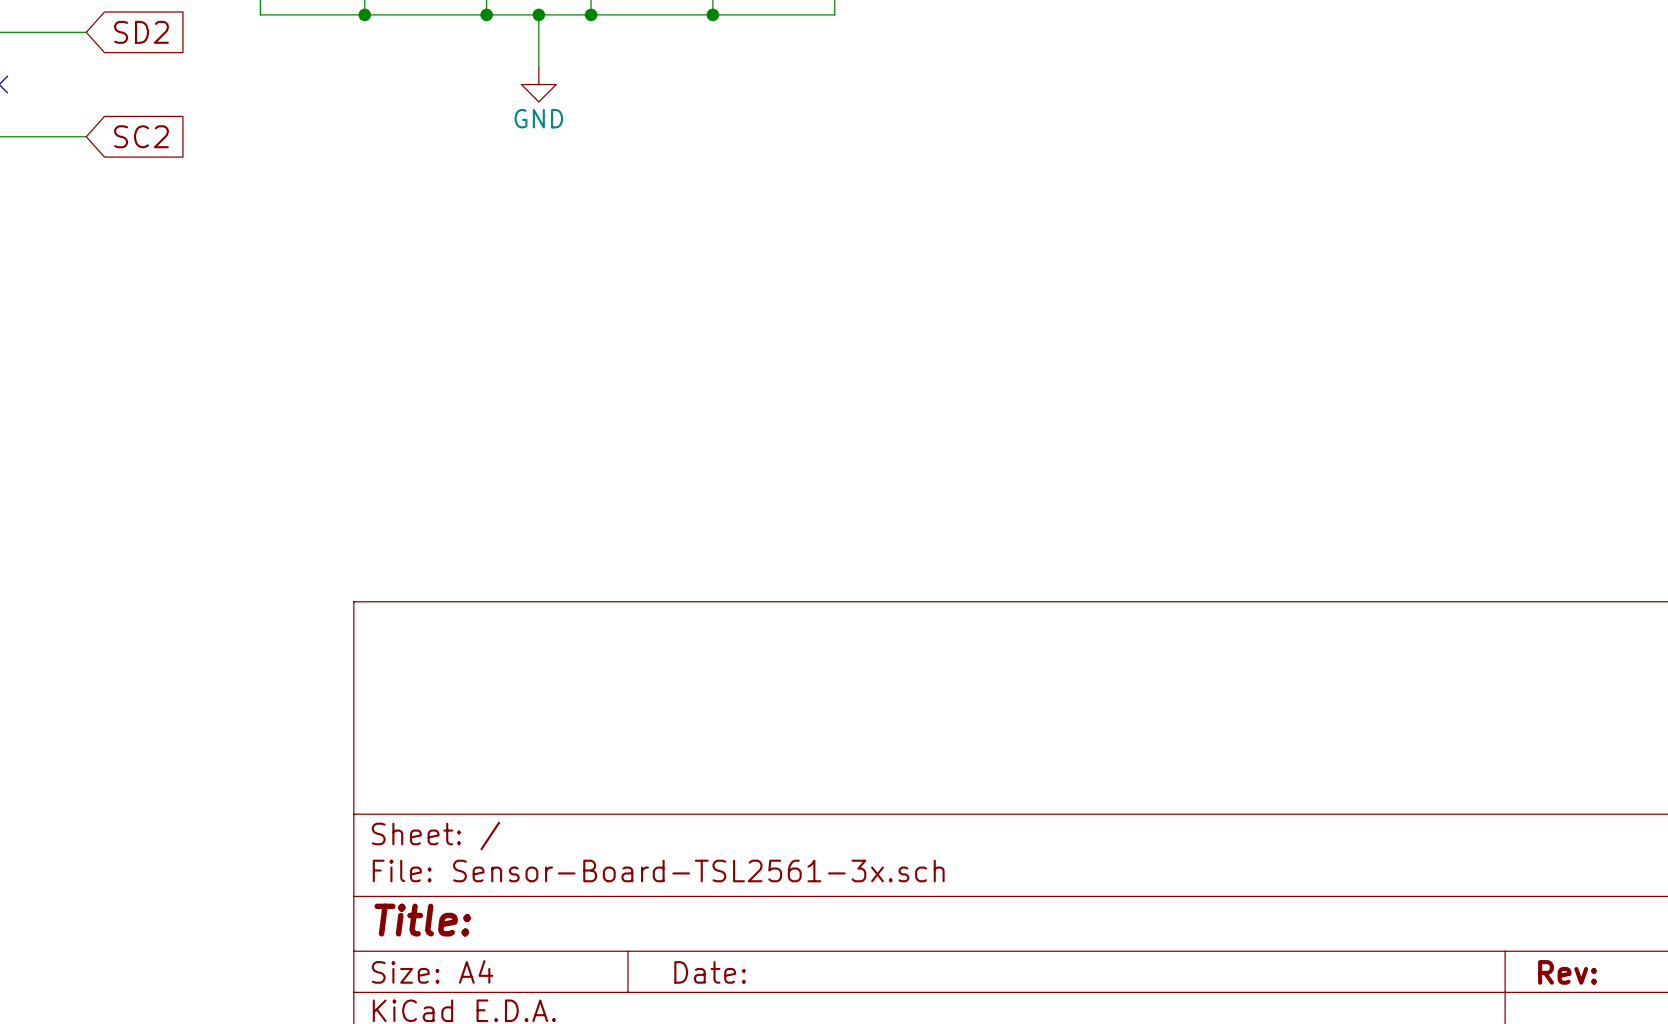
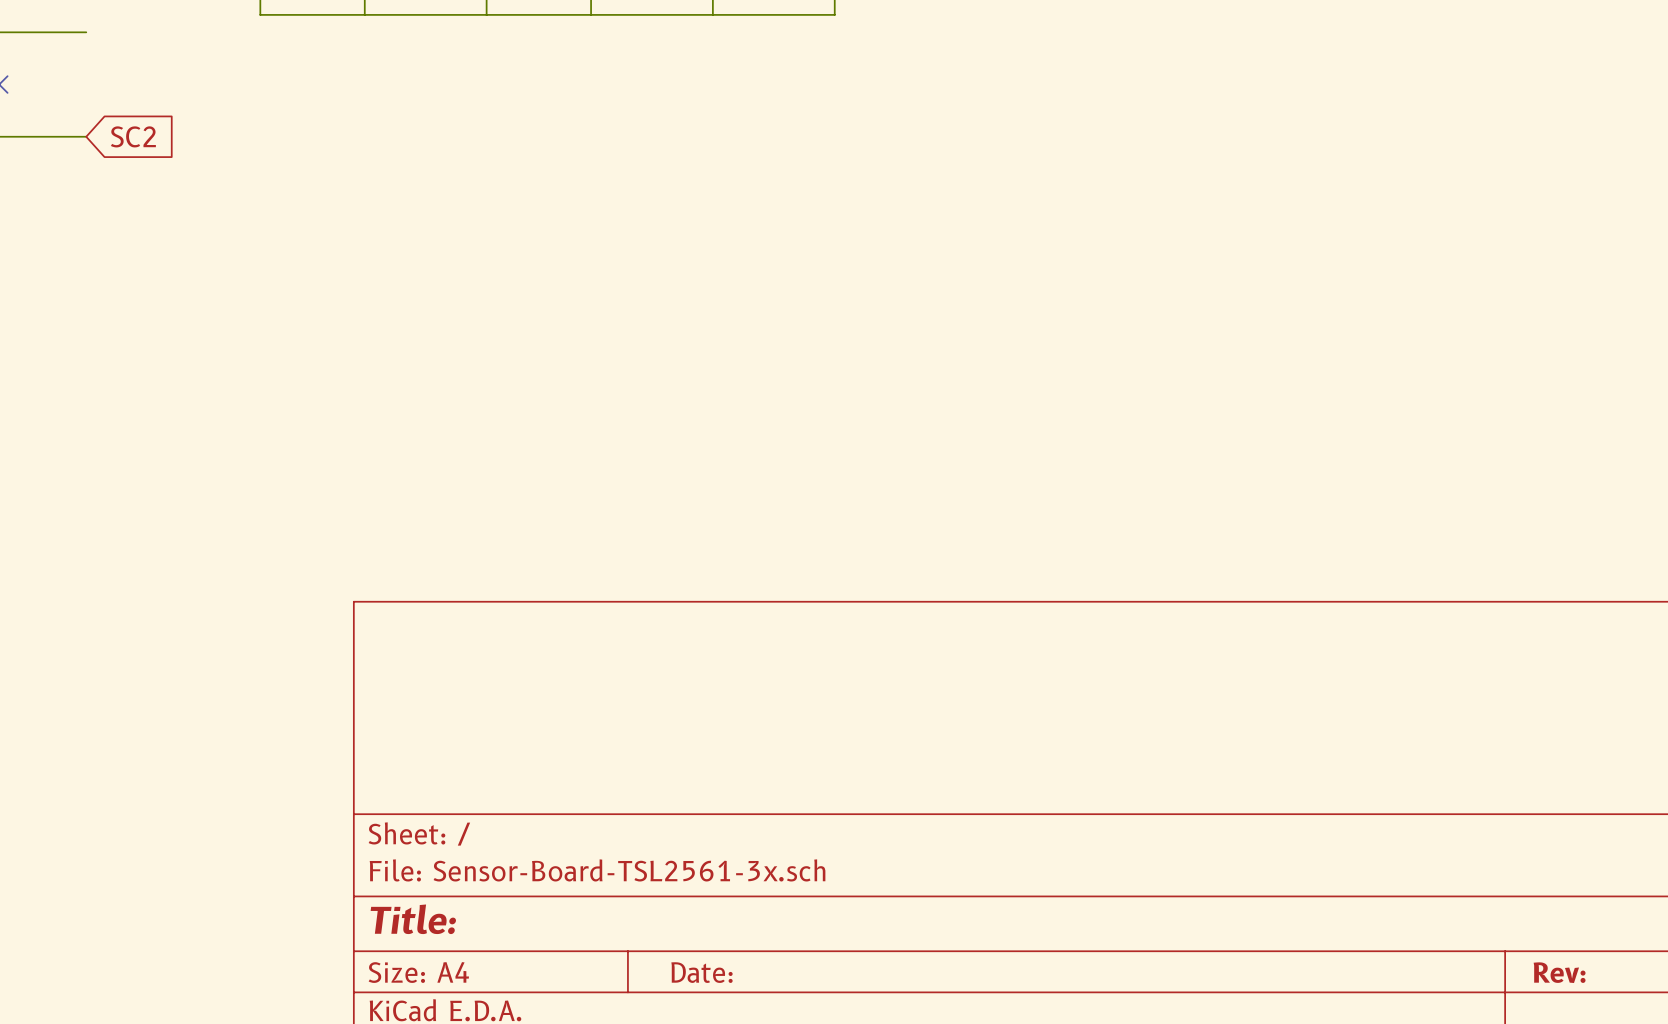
junction: (364, 14) -> none
junction: (486, 14) -> none
wire: (538, 14) (538, 67) -> none
junction: (538, 14) -> none
junction: (591, 14) -> none
junction: (712, 14) -> none
global label: SD2 (141, 32) -> none
power symbol: GND (538, 84) -> none

